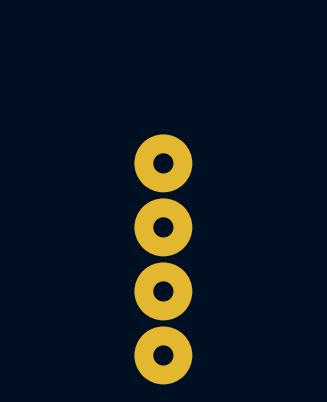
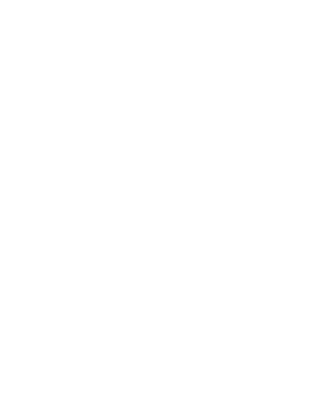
part: (163, 259) -> none

